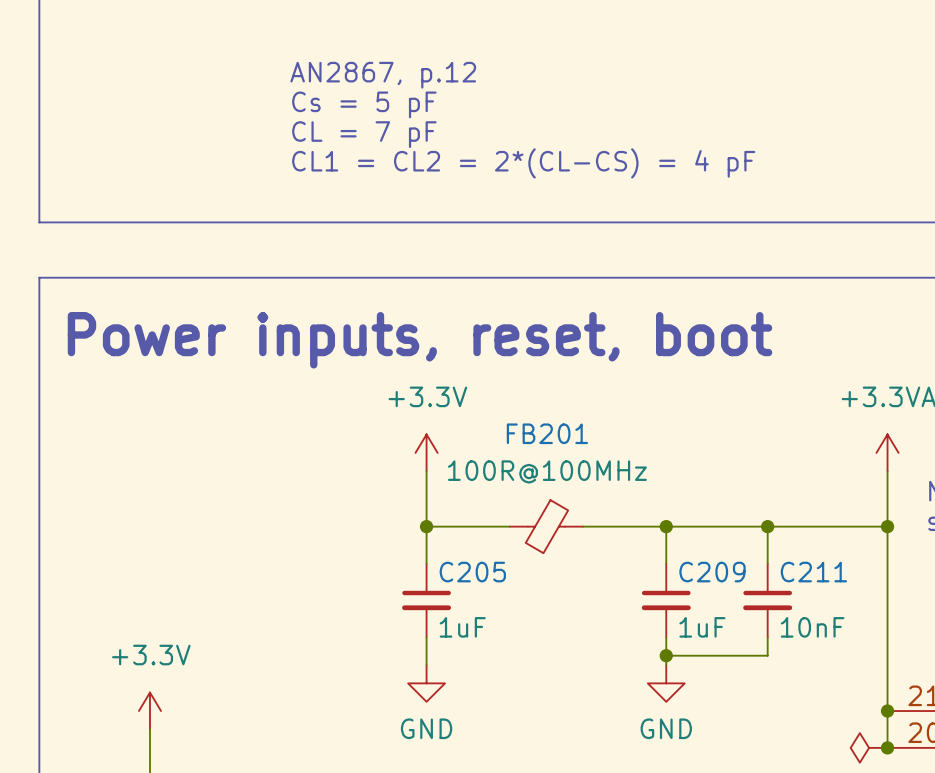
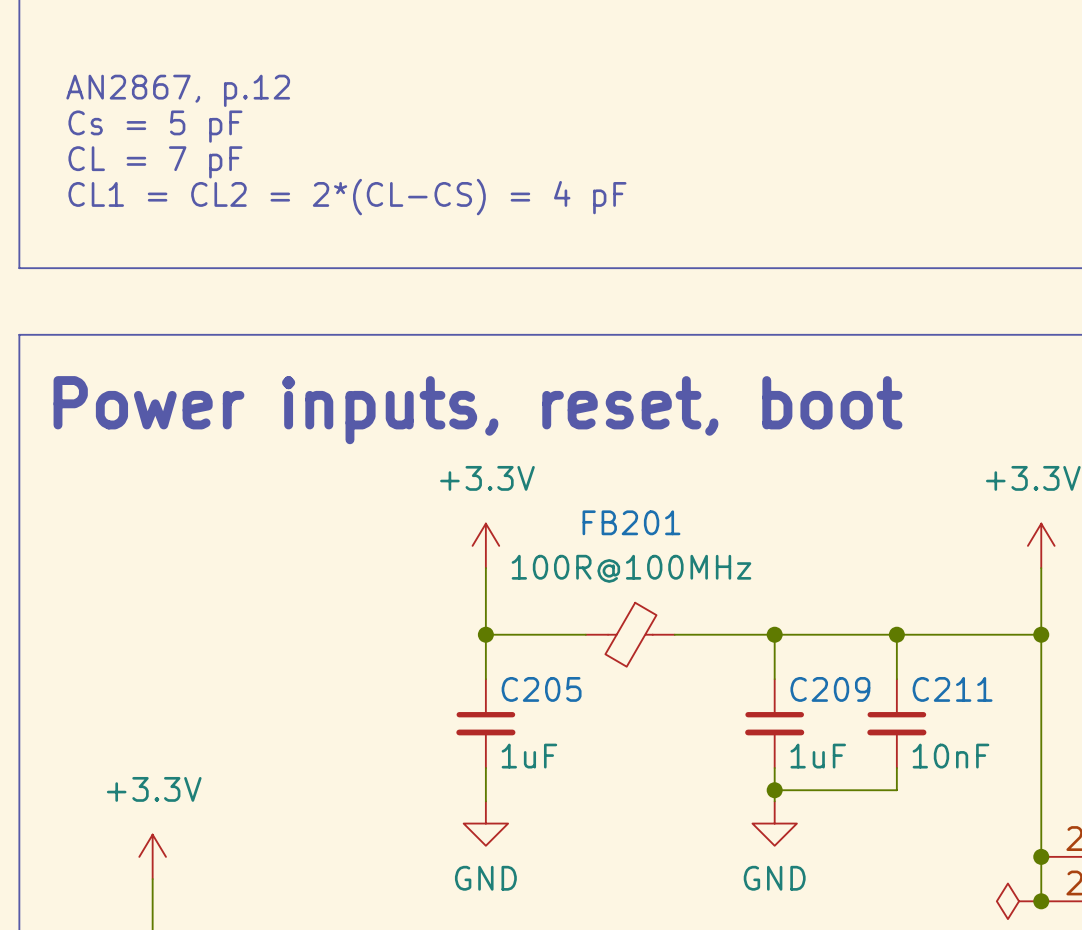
text position: AN2867, p.12 (383, 75) -> AN2867, p.12 (178, 90)
text position: Cs = 5 pF (364, 104) -> Cs = 5 pF (155, 126)
text position: CL = 7 pF (364, 134) -> CL = 7 pF (155, 162)
text position: CL1 = CL2 = 2*(CL-CS) = 4 pF (523, 163) -> CL1 = CL2 = 2*(CL-CS) = 4 pF (347, 197)

